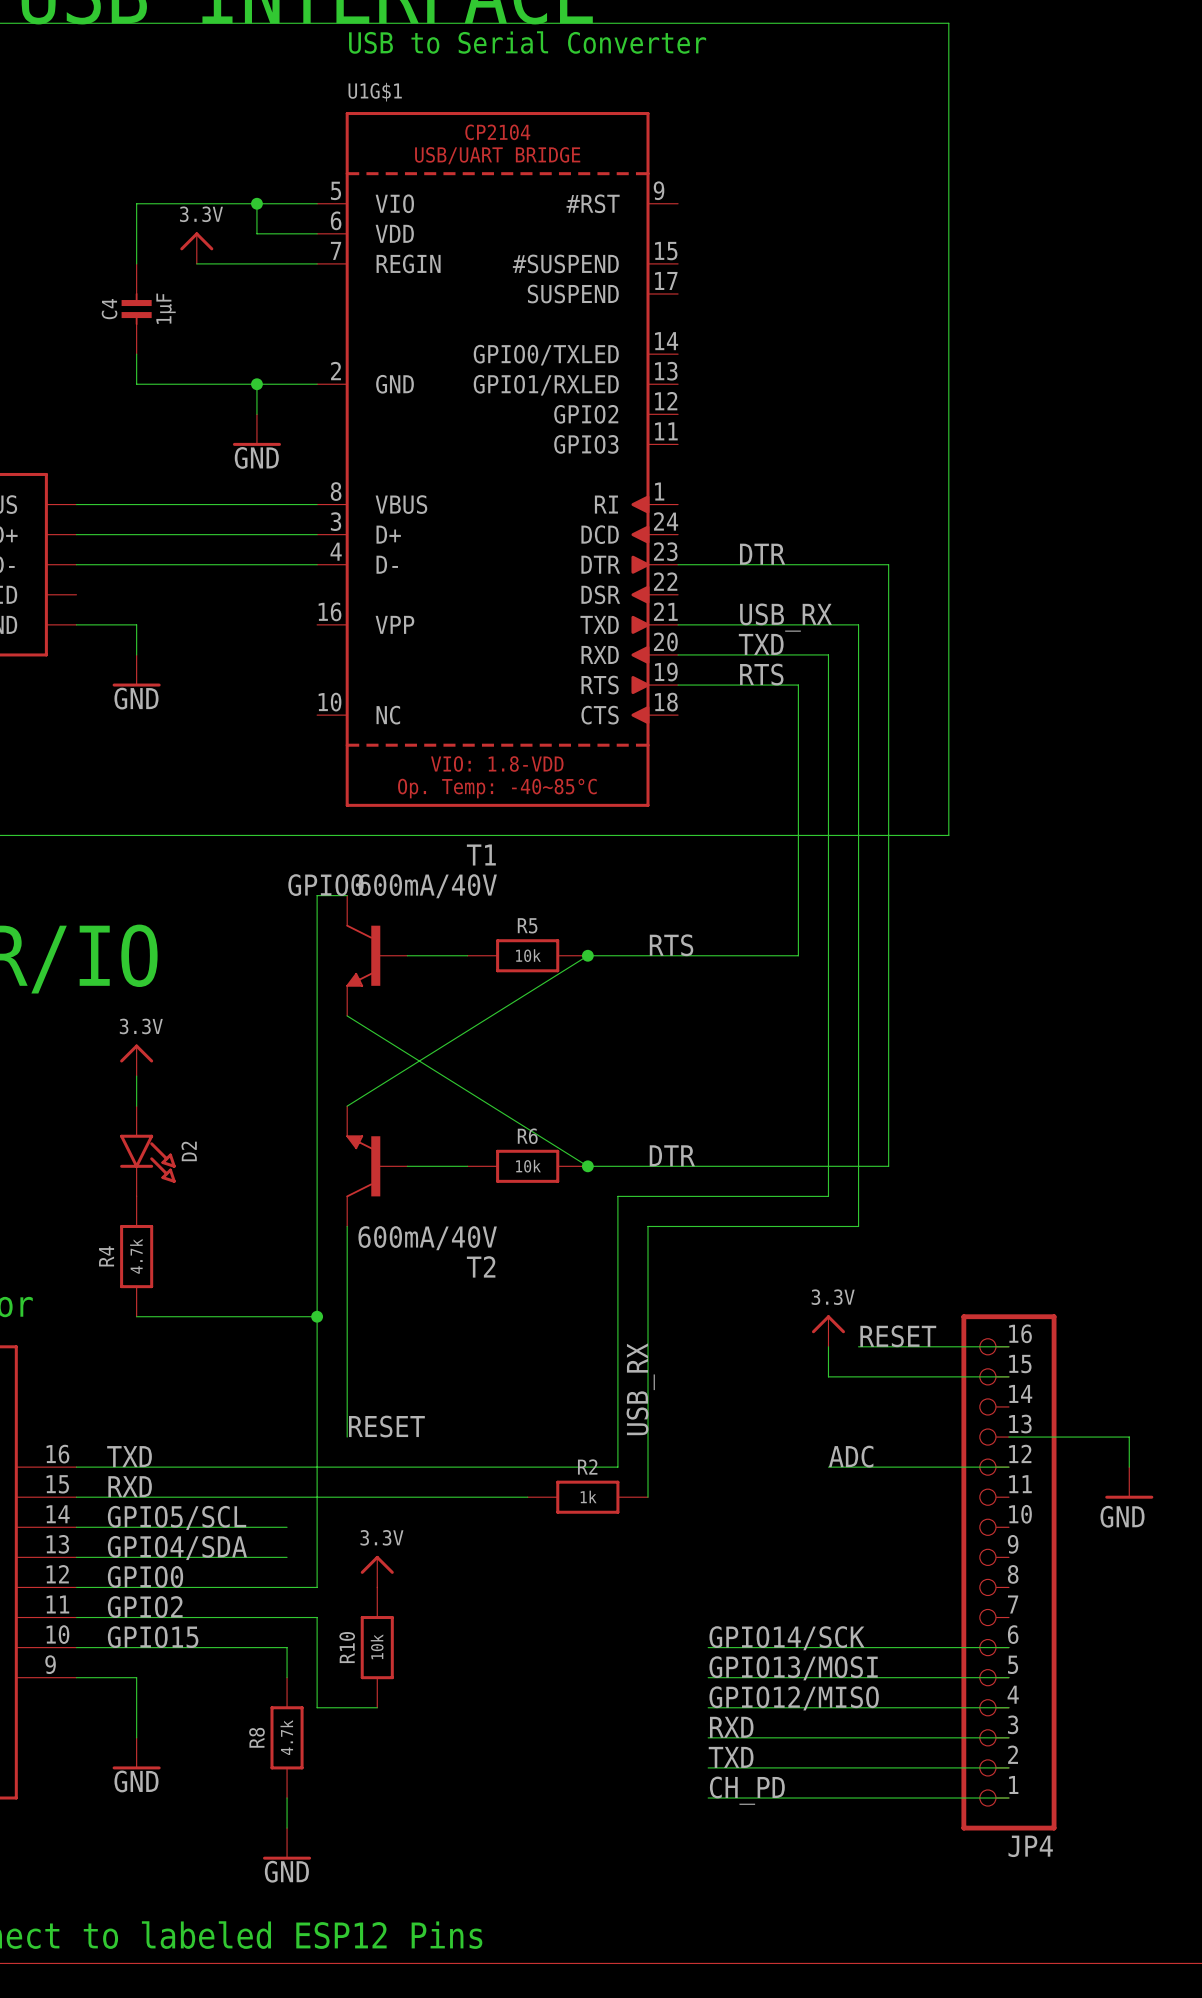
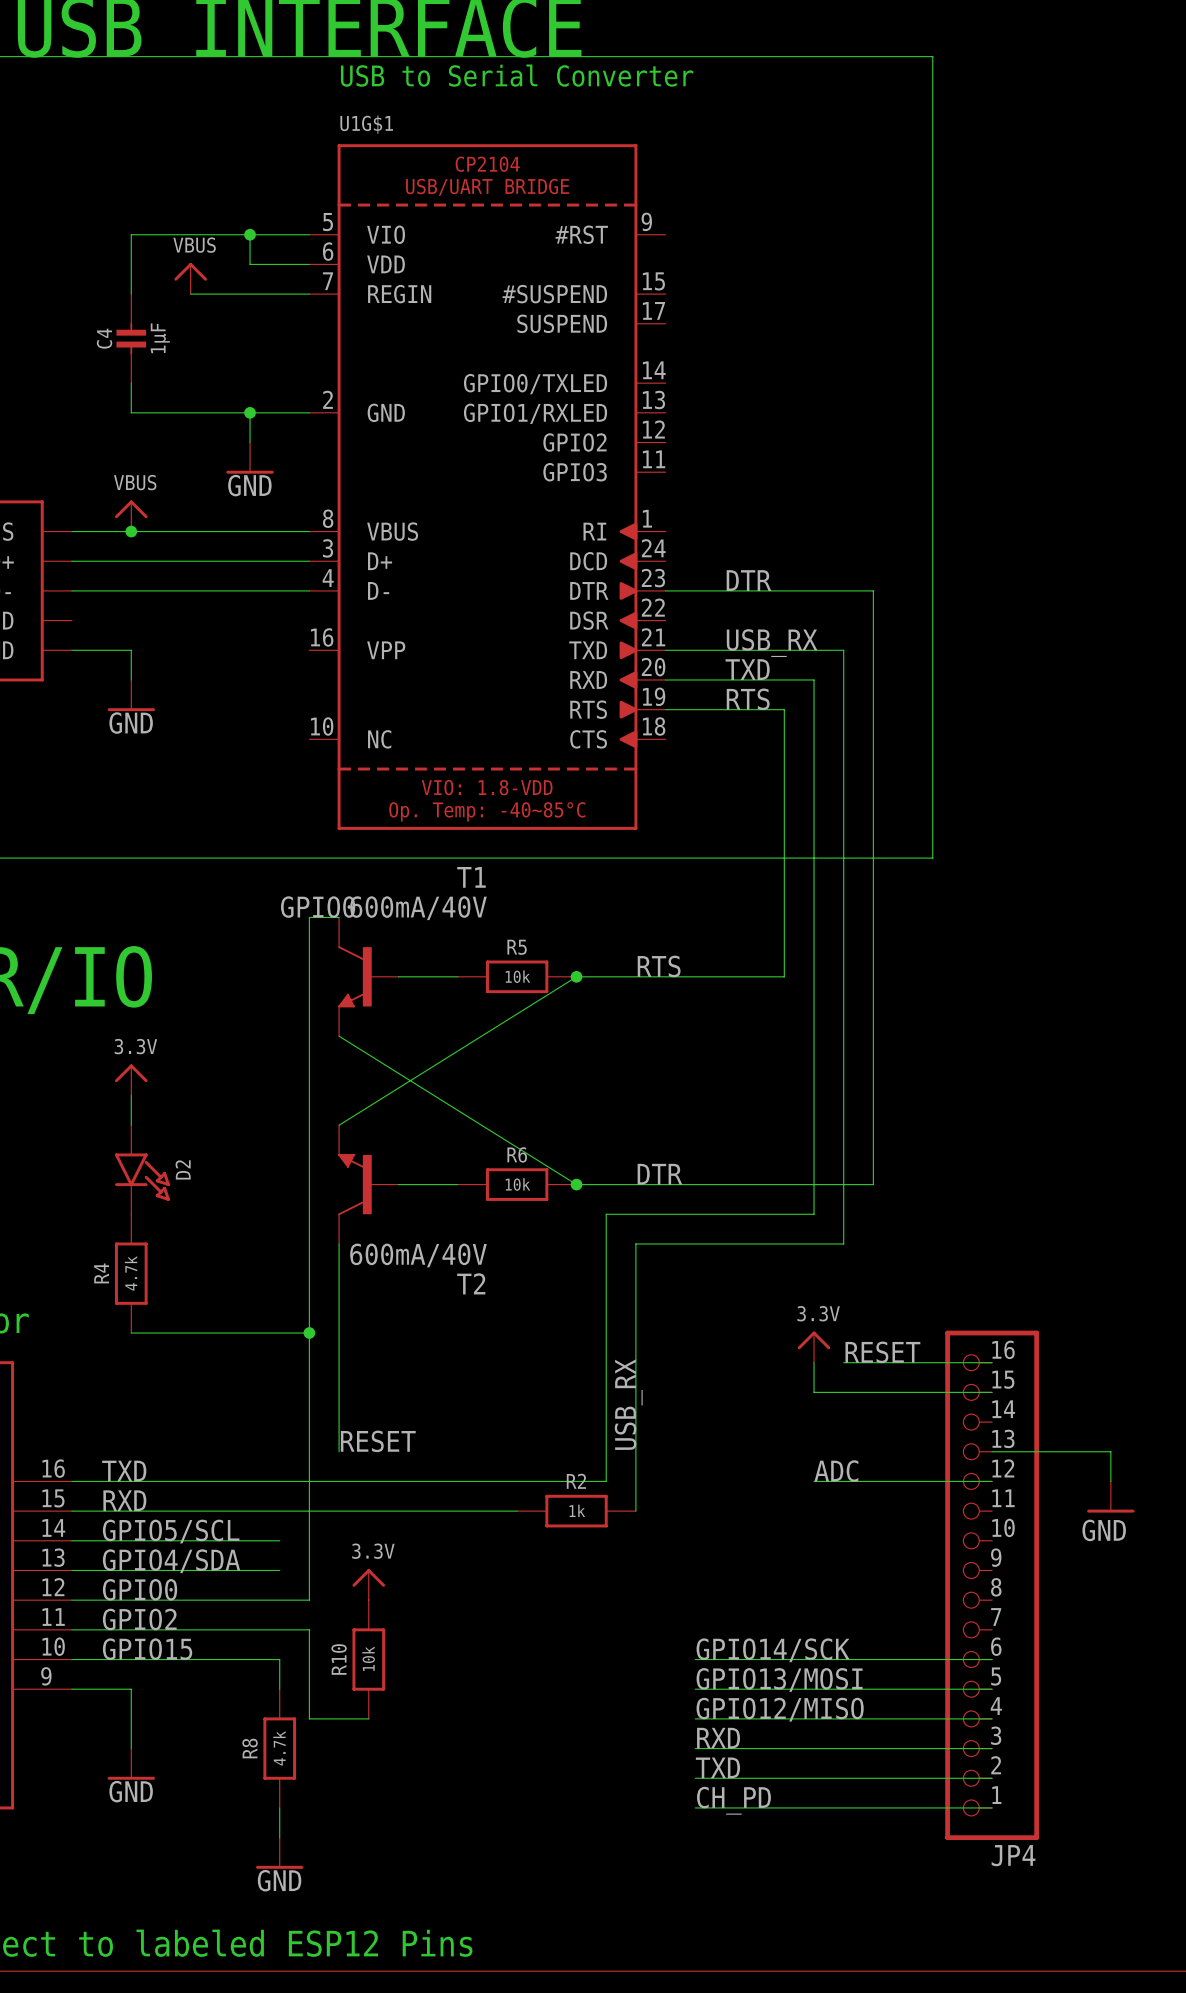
power symbol: 3.3V (196, 248) -> VBUS (190, 278)
power symbol: none -> VBUS (131, 515)
junction: none -> (131, 531)

